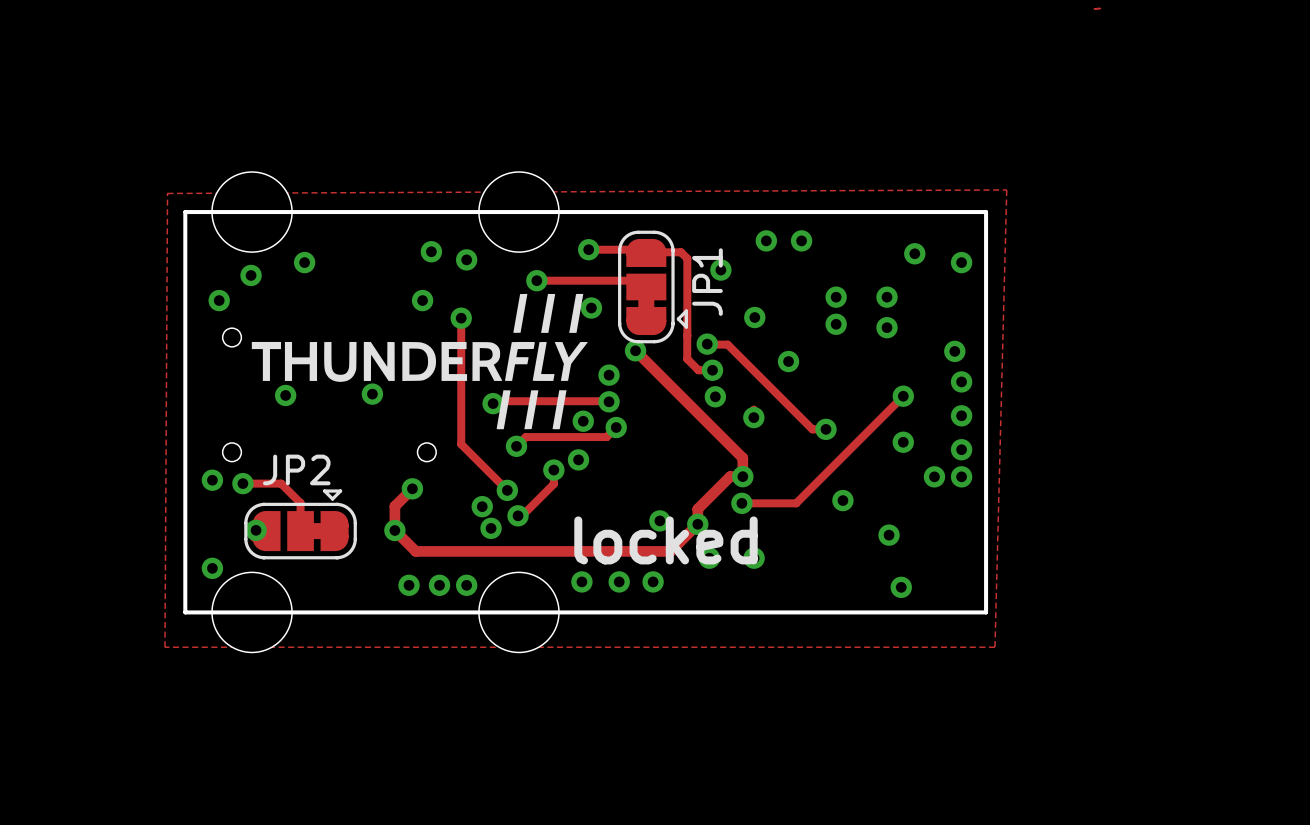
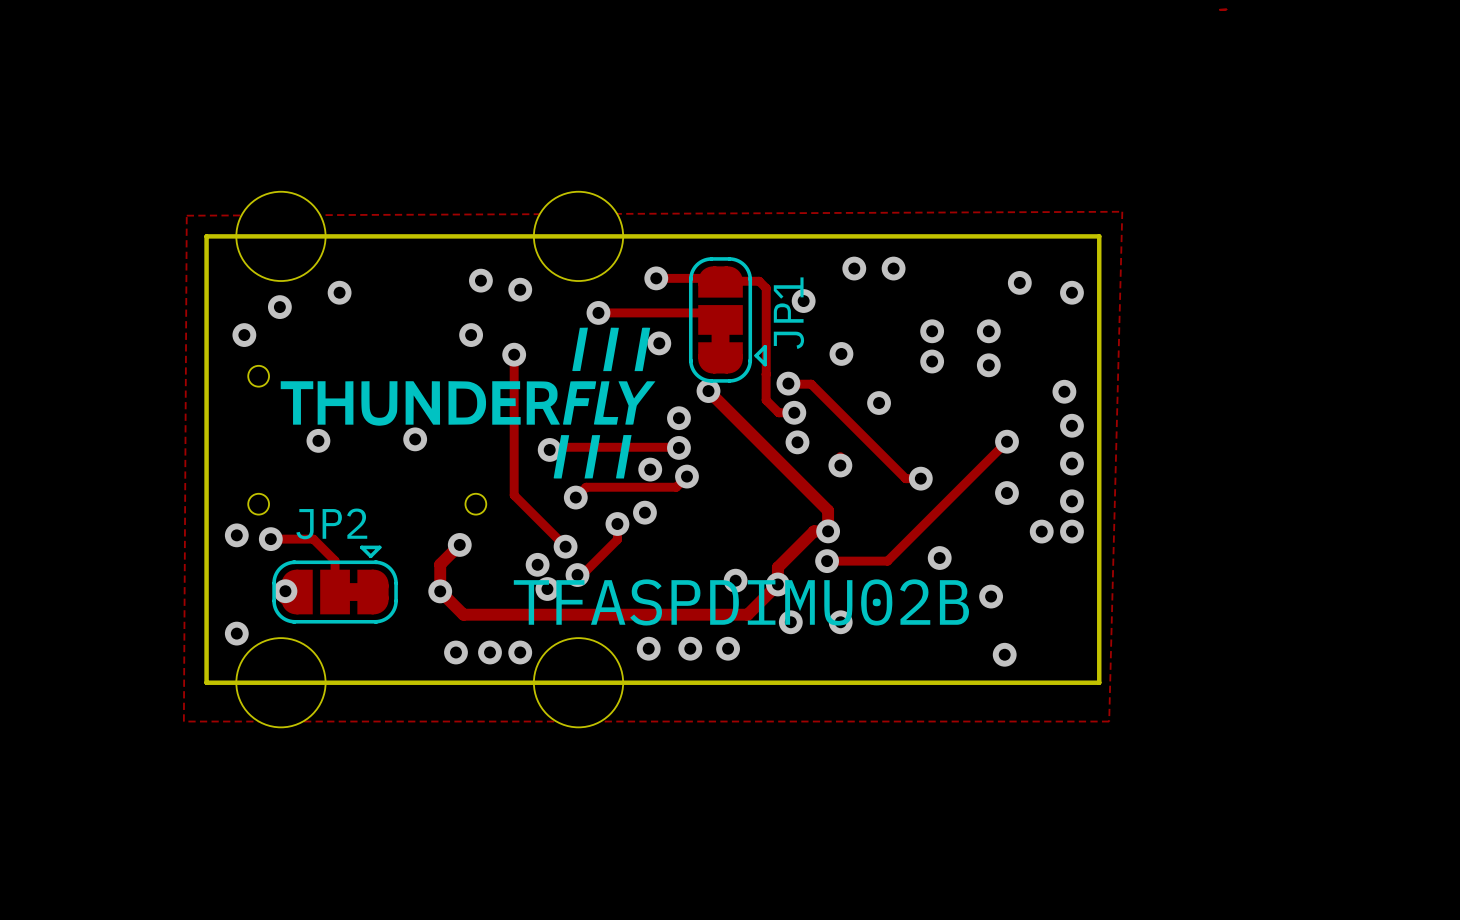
text: locked (665, 540) -> TFASPDIMU02B (741, 602)

